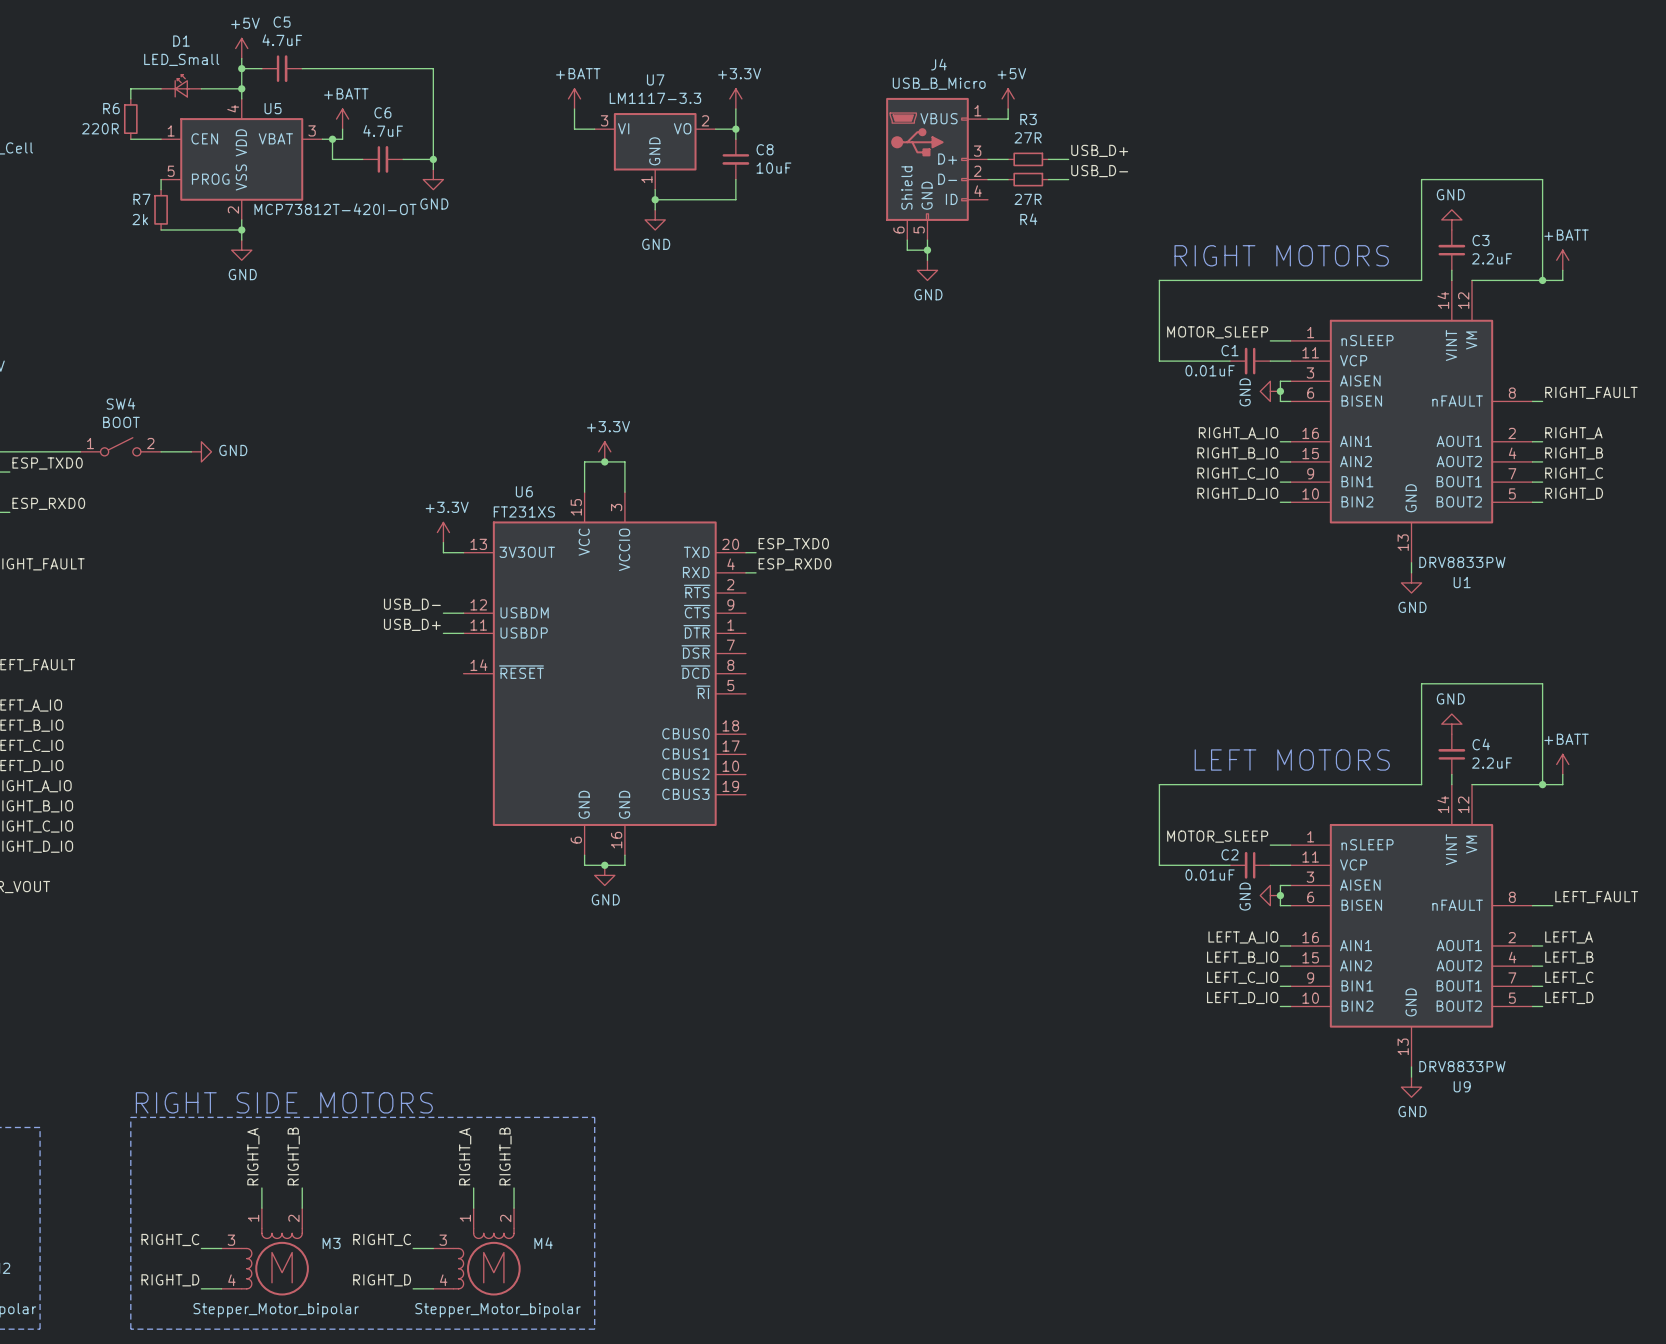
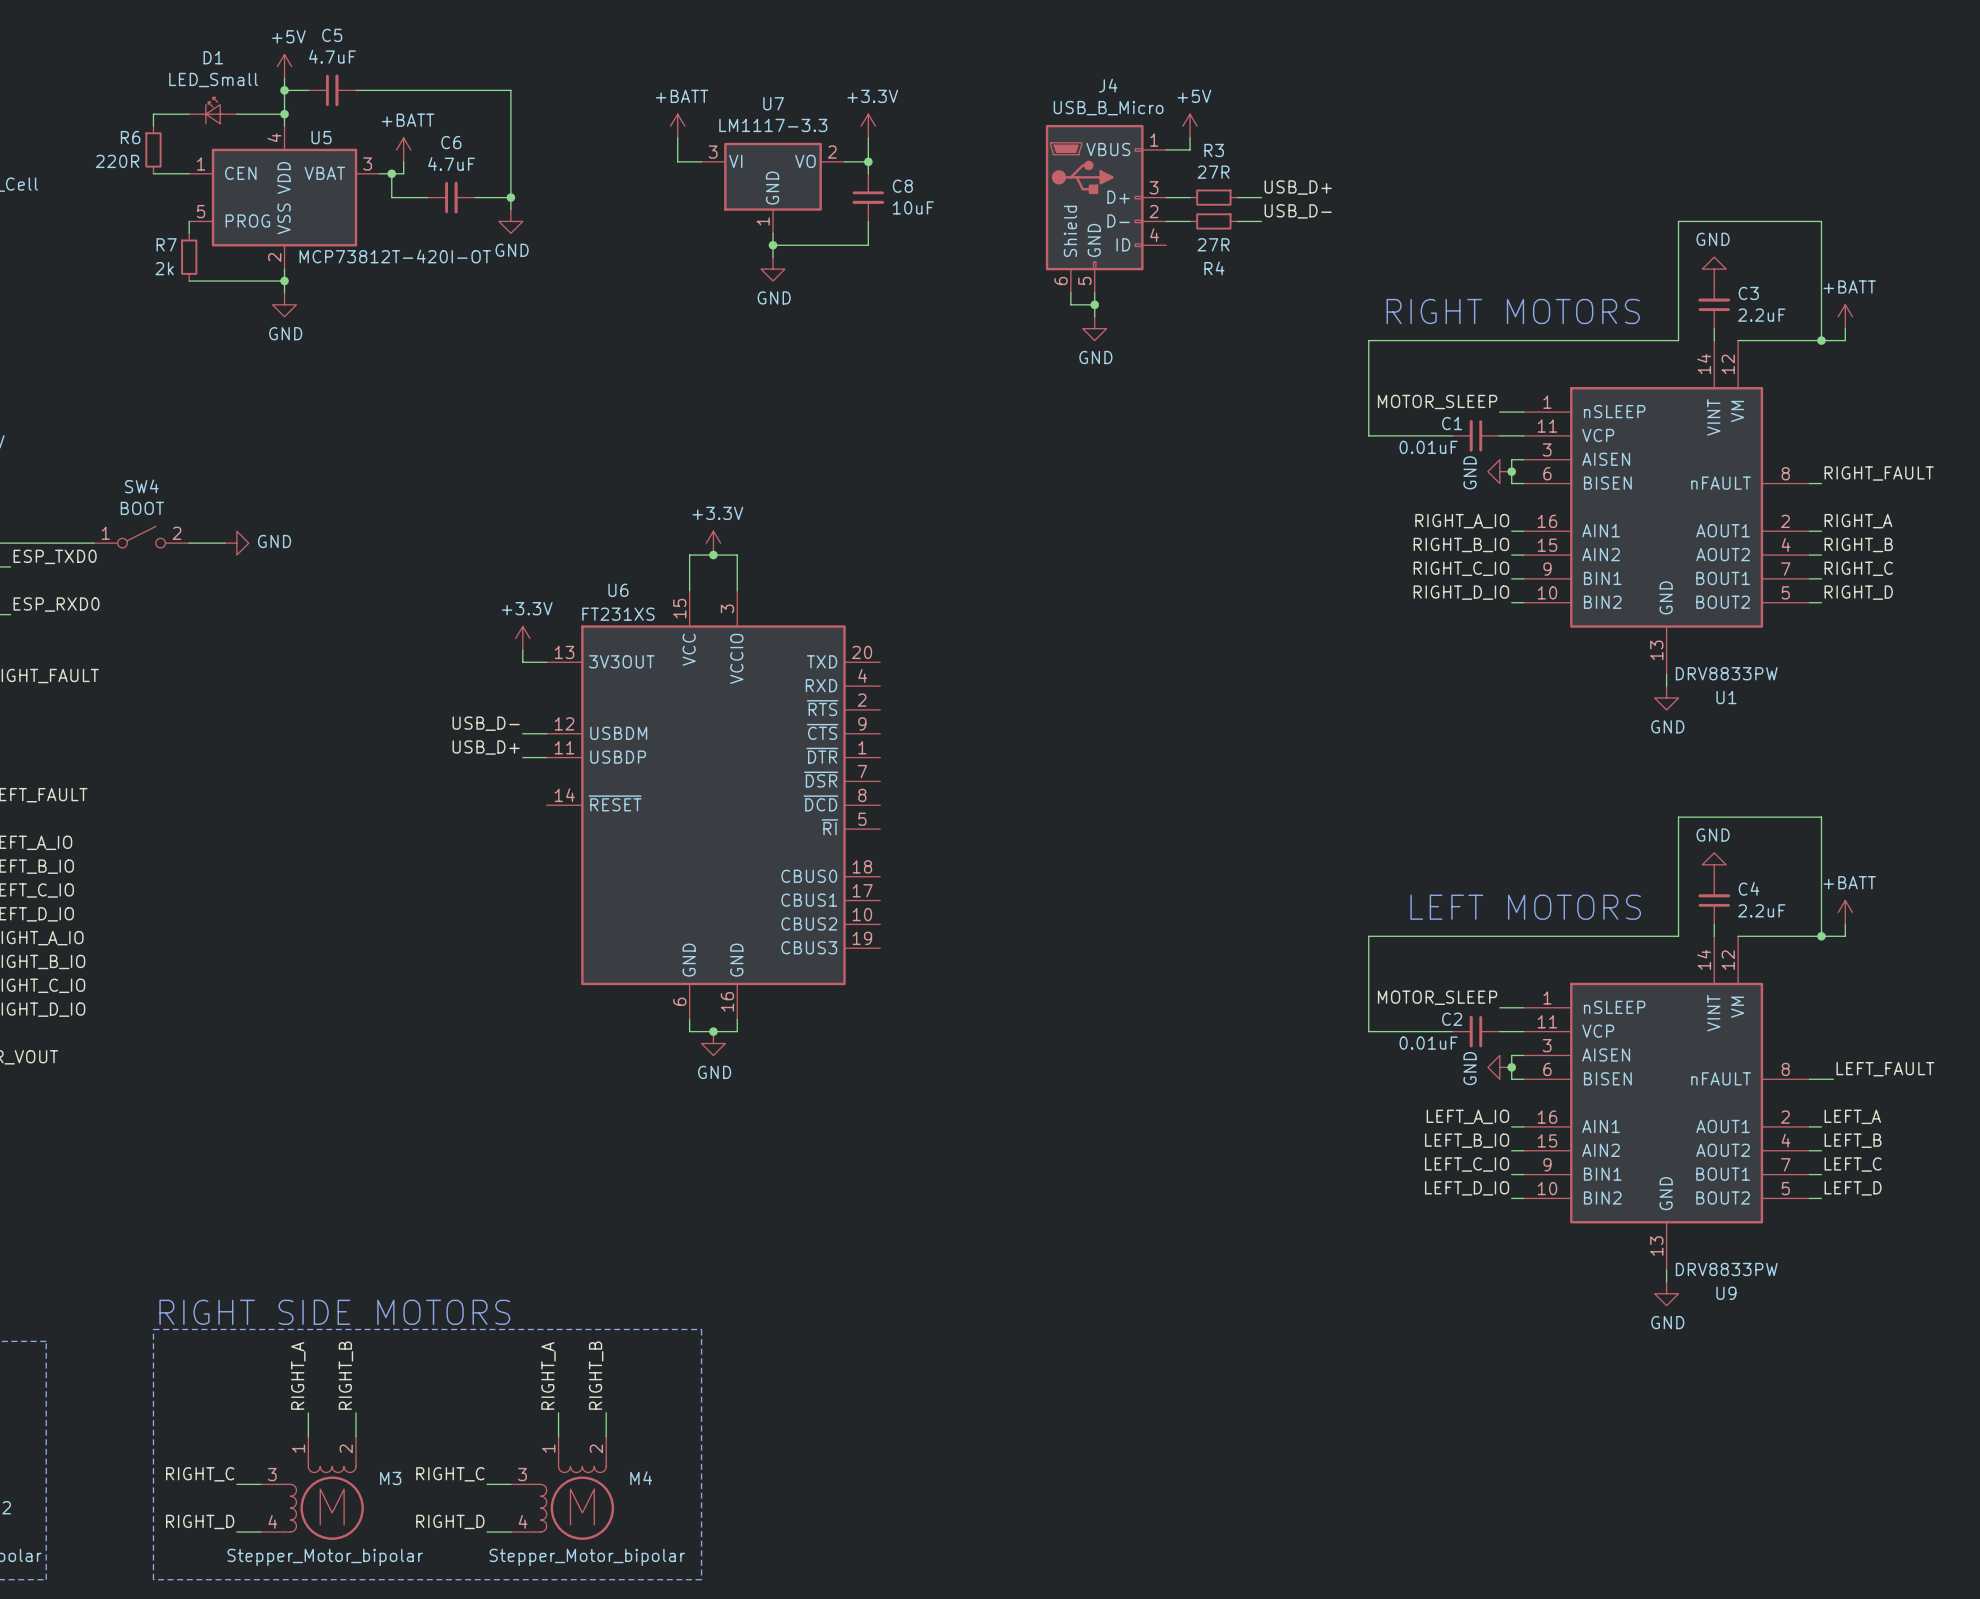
label: ESP_TXD0 (793, 544) -> none
wire: (745, 552) (756, 552) -> none
label: ESP_RXD0 (795, 564) -> none
wire: (745, 572) (756, 572) -> none

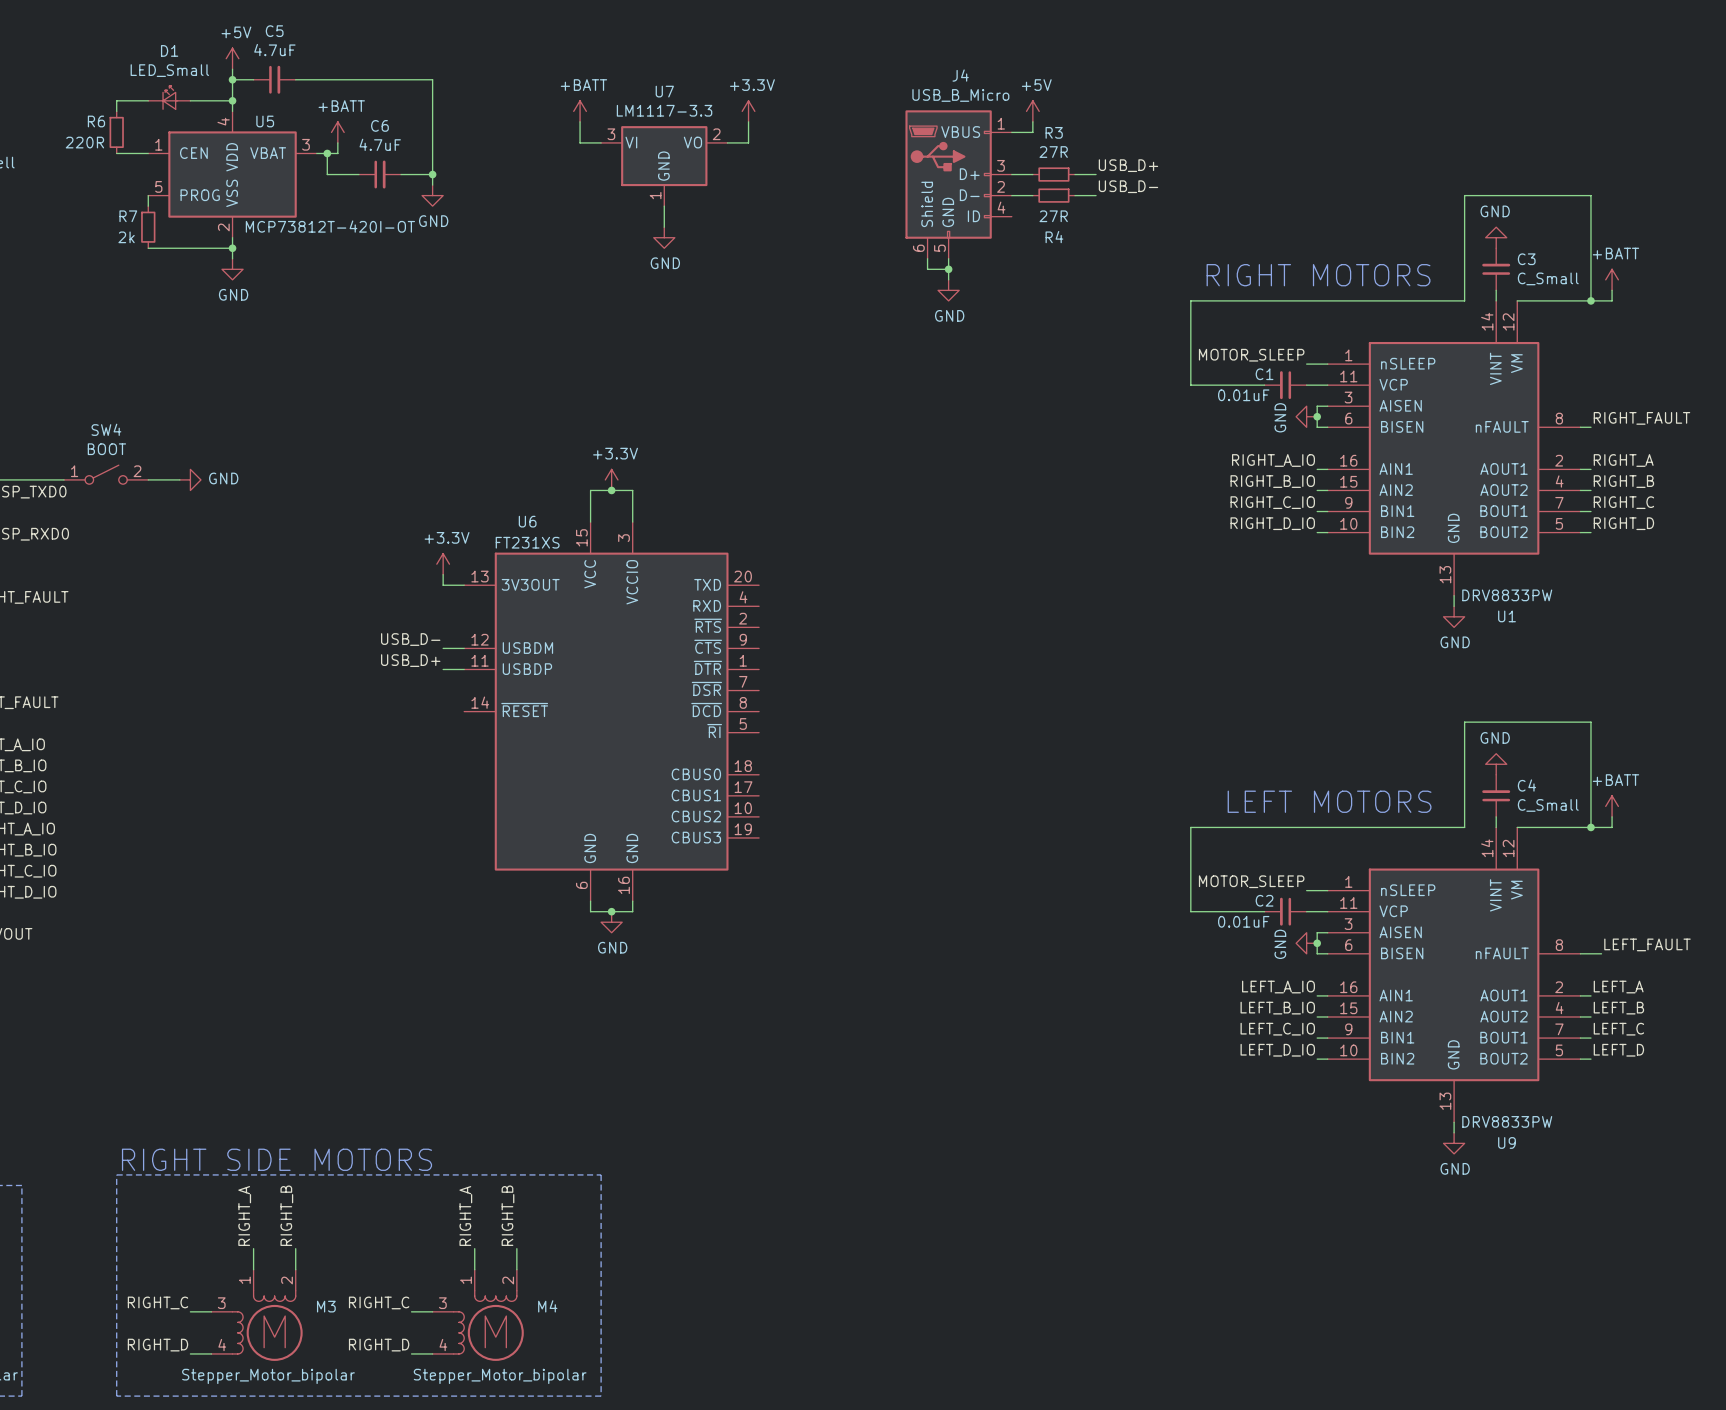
wire: (868, 161) (868, 173) -> none
junction: (868, 161) -> none
C8: 10uF (868, 197) -> none
wire: (868, 221) (868, 245) (773, 245) -> none
junction: (773, 245) -> none
C3 value: 2.2uF (1761, 315) -> C_Small (1548, 278)
C4 value: 2.2uF (1761, 910) -> C_Small (1548, 805)

